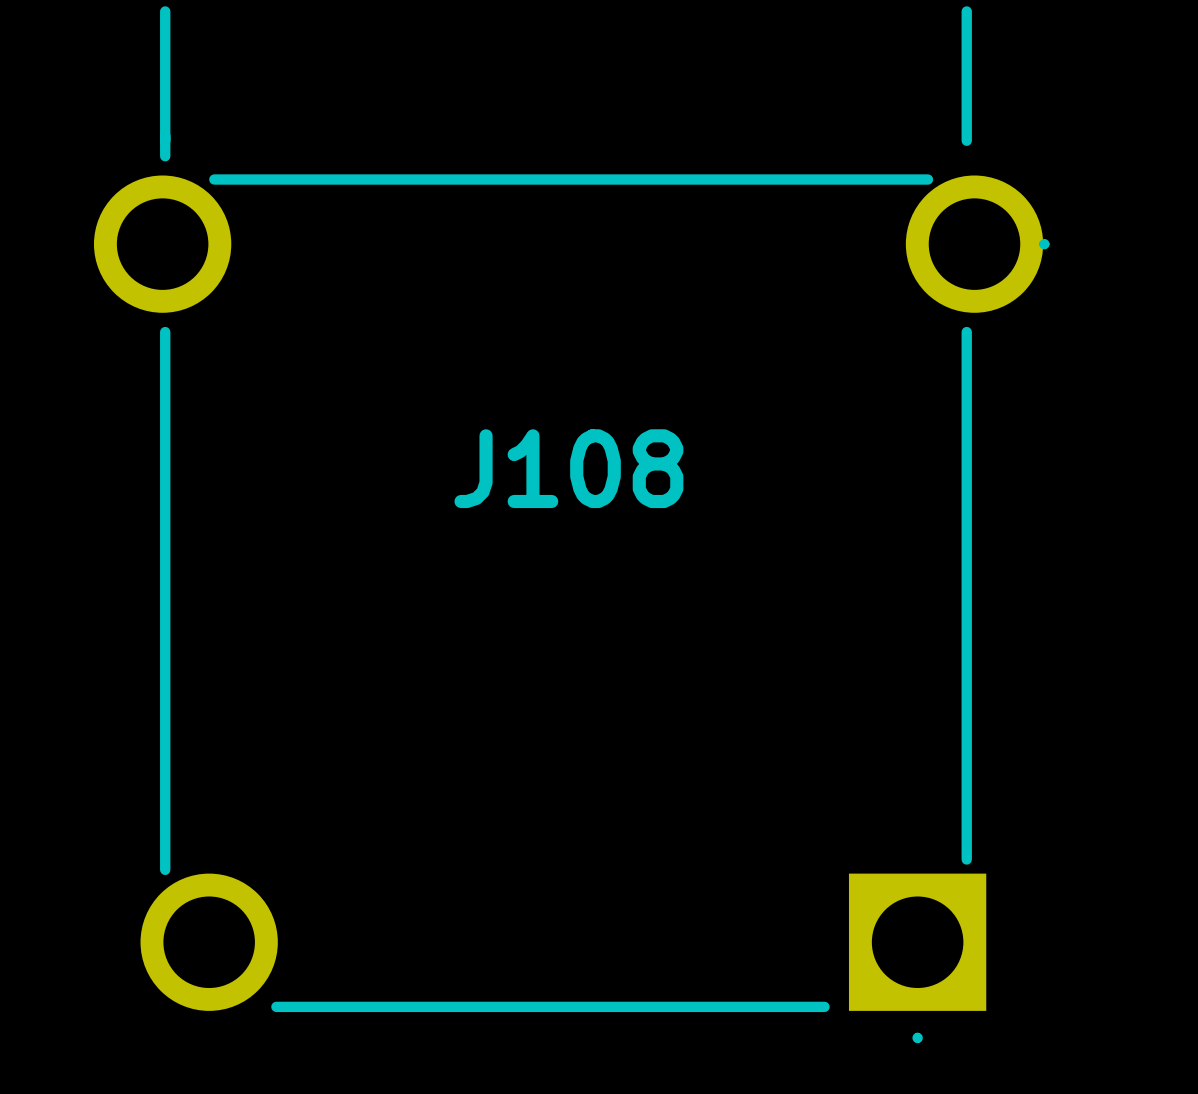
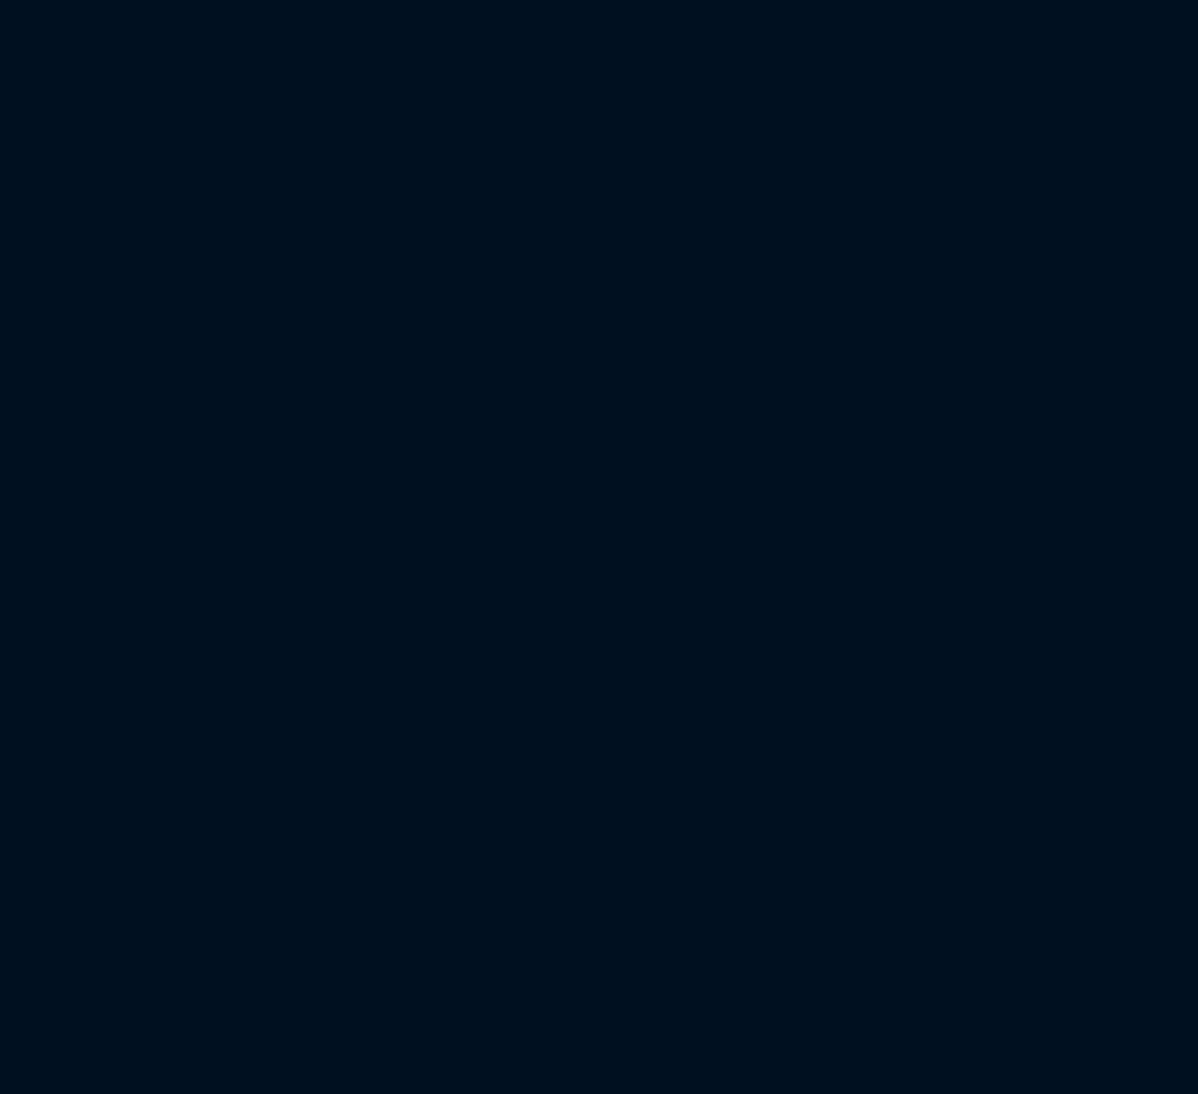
J108: (571, 524) -> none

